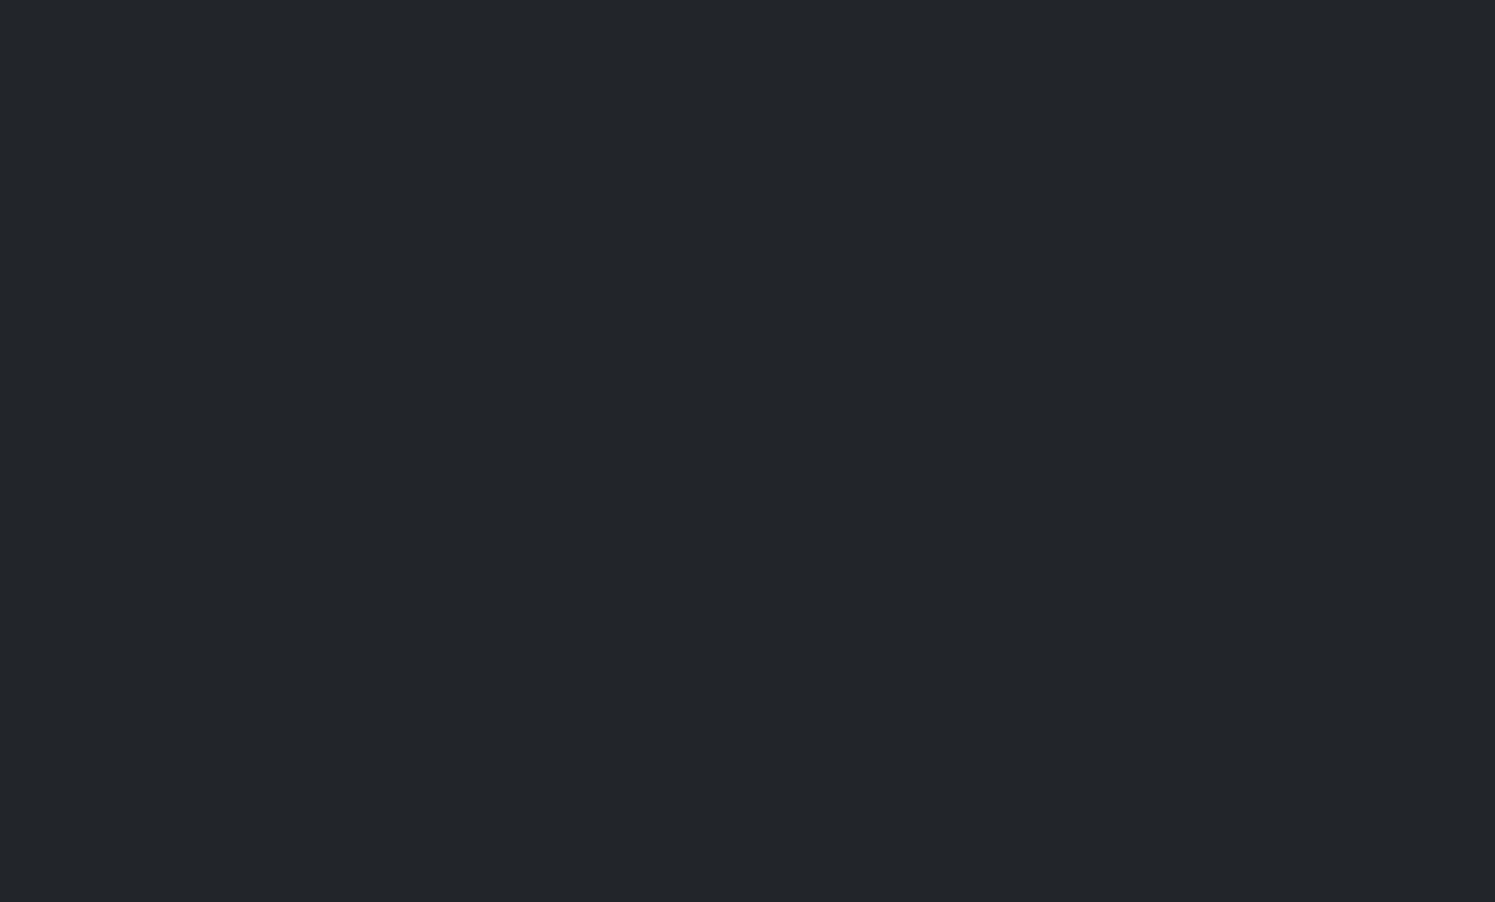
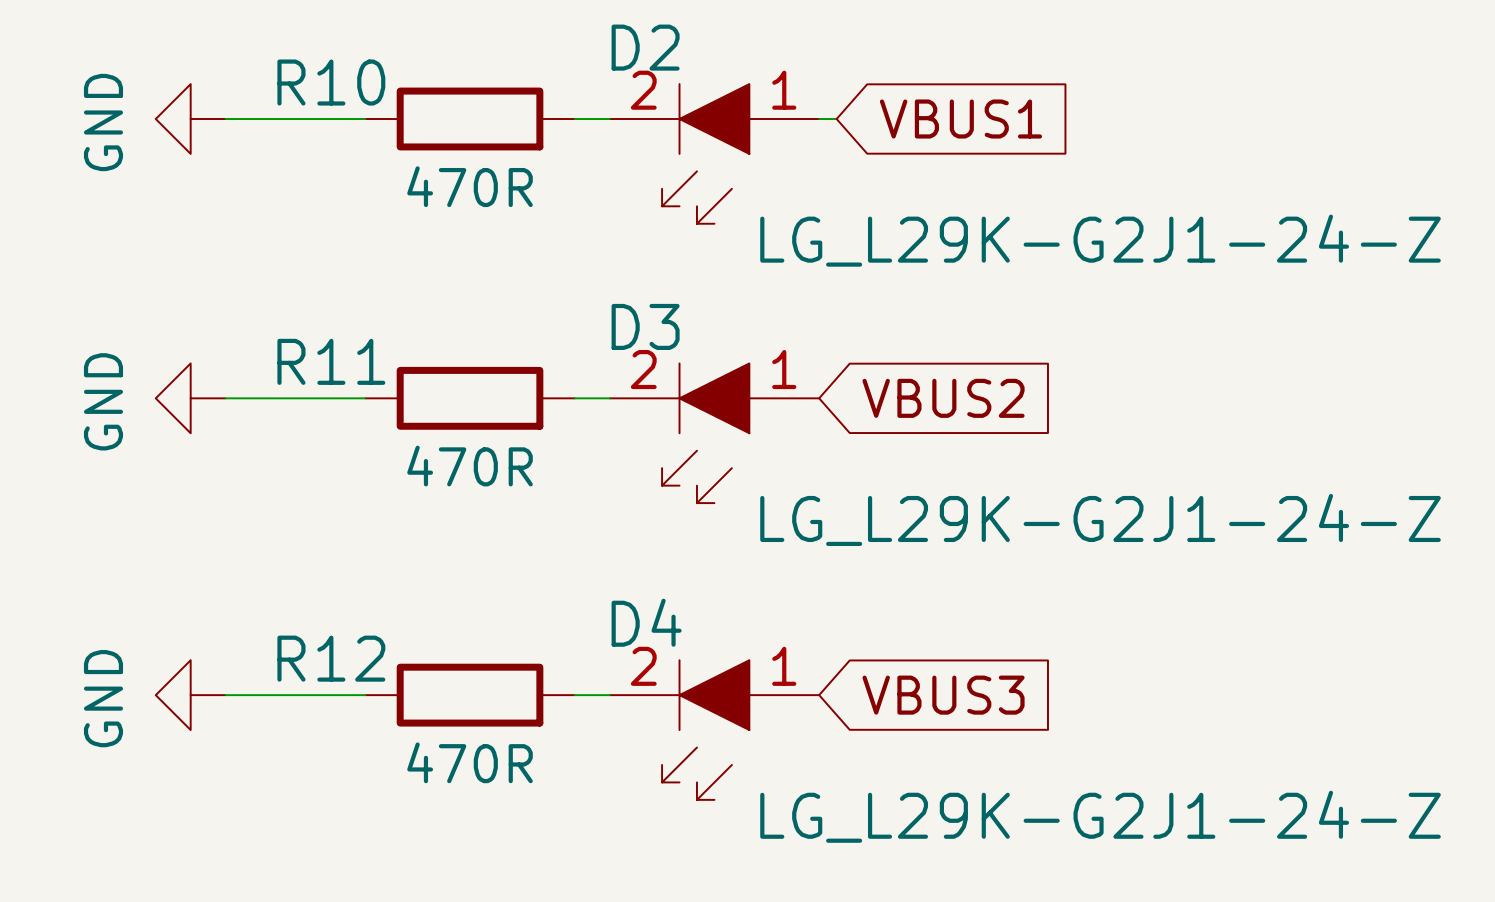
power symbol: none -> GND (190, 119)
wire: none -> (225, 119) (365, 119)
R10: none -> (470, 119)
wire: none -> (574, 119) (609, 119)
wire: none -> (819, 119) (836, 119)
global label: none -> VBUS1 (960, 119)
D2: none -> LG_L29K-G2J1-24-Z (714, 153)
power symbol: none -> GND (190, 398)
wire: none -> (225, 398) (365, 398)
R11: none -> (470, 398)
wire: none -> (574, 398) (609, 398)
global label: none -> VBUS2 (943, 398)
D3: none -> LG_L29K-G2J1-24-Z (714, 433)
power symbol: none -> GND (190, 695)
wire: none -> (225, 695) (365, 695)
R12: none -> (470, 695)
wire: none -> (574, 695) (609, 695)
global label: none -> VBUS3 (943, 695)
D4: none -> LG_L29K-G2J1-24-Z (714, 730)

